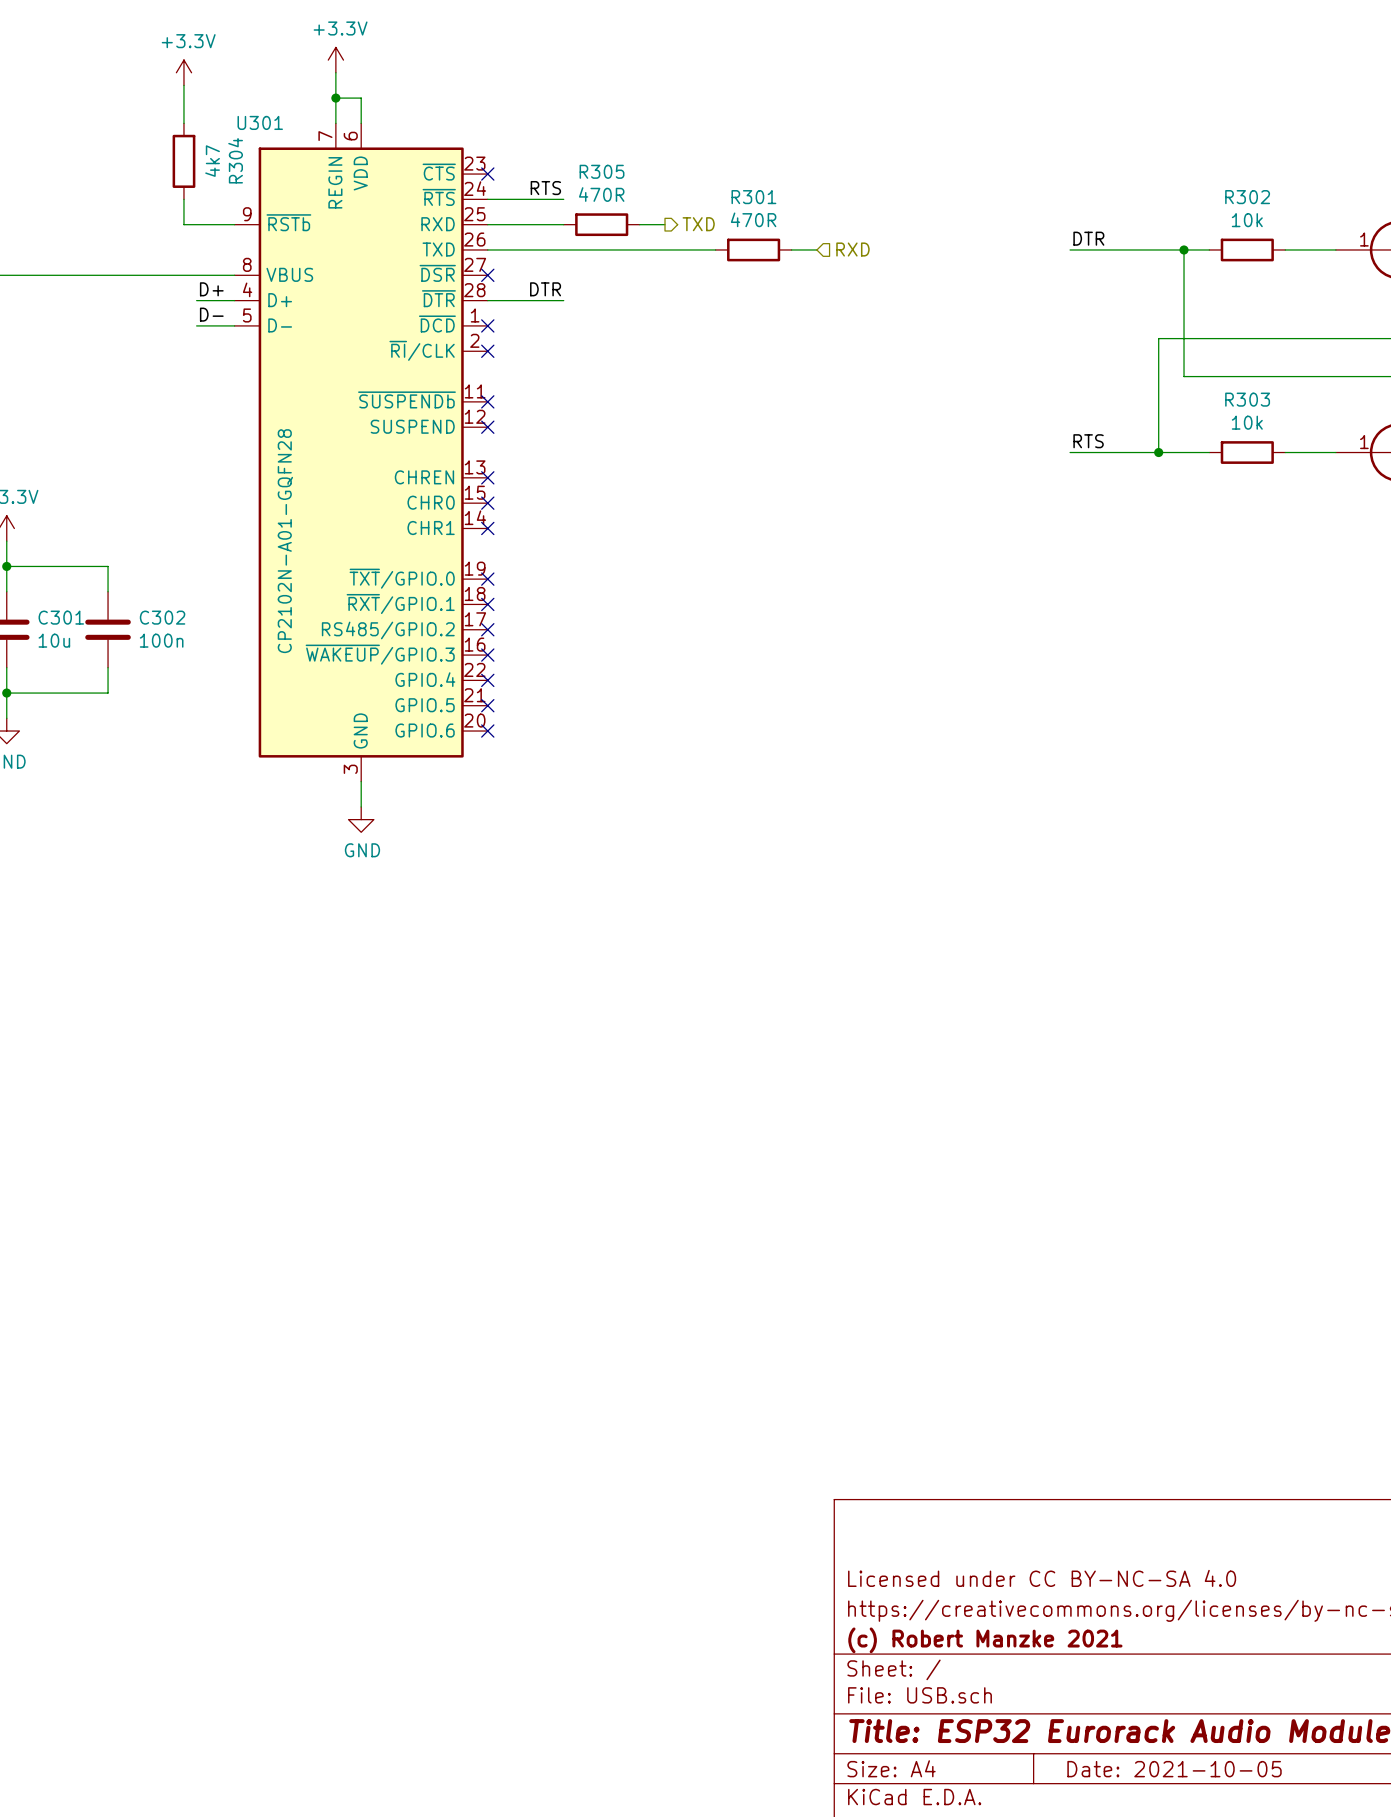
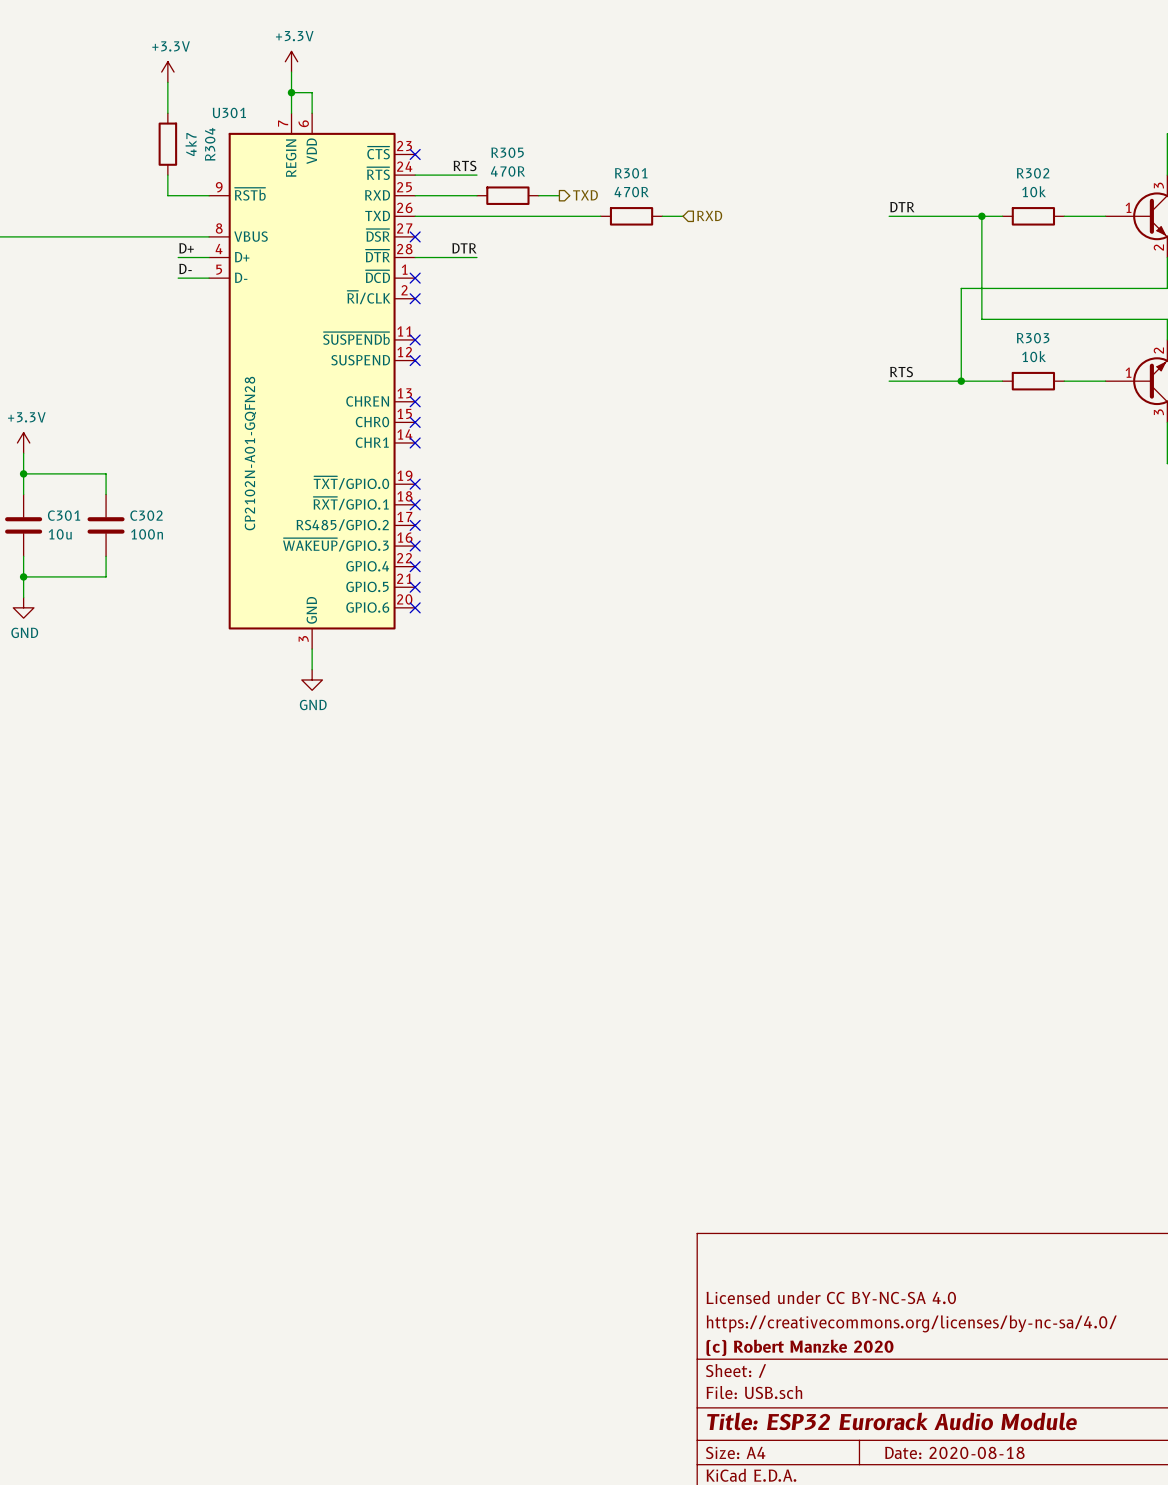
title block: (c) Robert Manzke 2021 (985, 1640) -> (c) Robert Manzke 2020 (799, 1347)
title block: Date: 2021-10-05 (1174, 1769) -> Date: 2020-08-18 (954, 1452)

